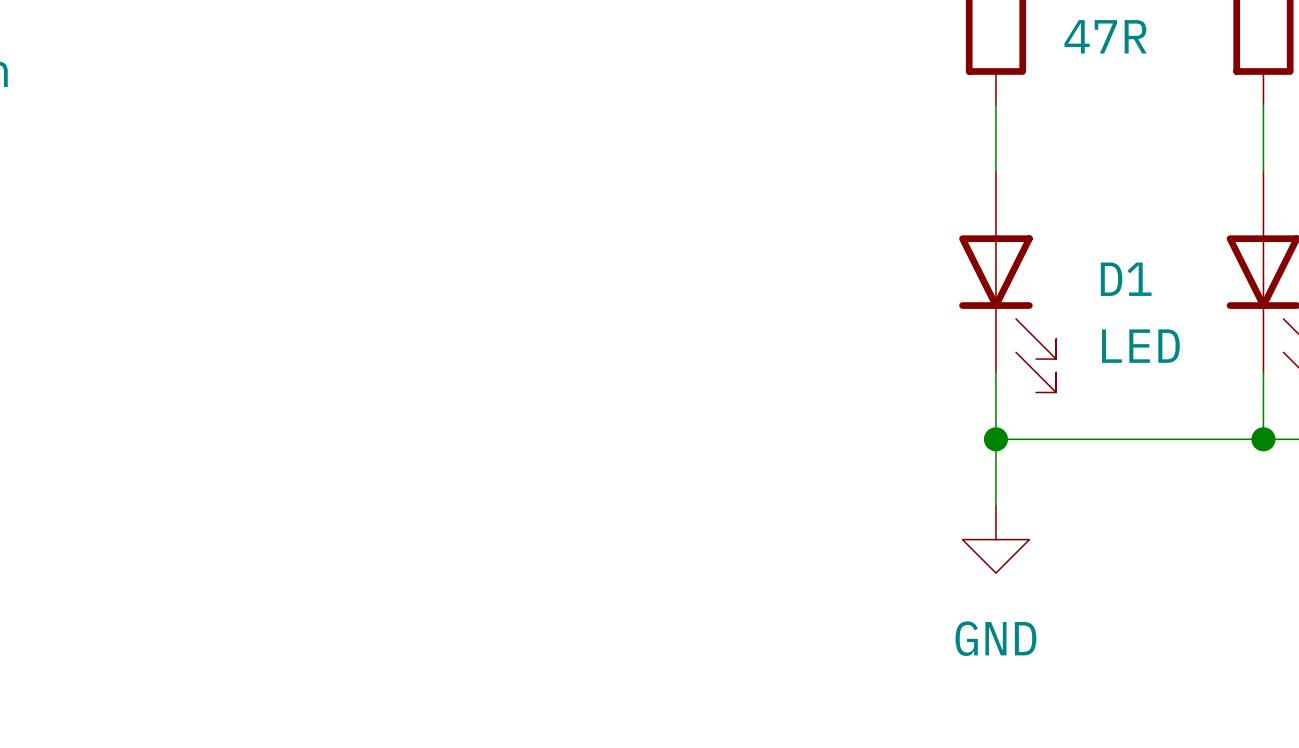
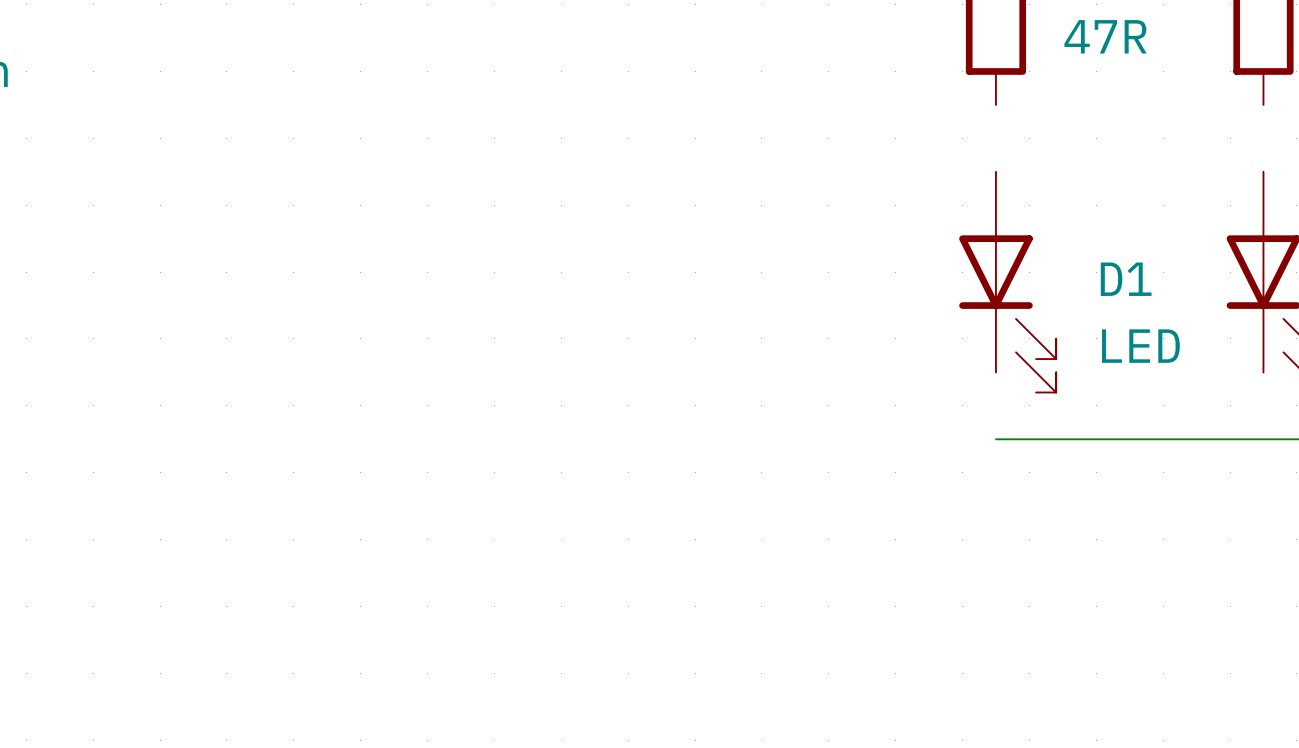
wire: (995, 104) (995, 171) -> none
wire: (1263, 104) (1263, 171) -> none
wire: (995, 372) (995, 506) -> none
wire: (1263, 372) (1263, 439) -> none
junction: (995, 439) -> none
junction: (1263, 439) -> none
power symbol: GND (995, 539) -> none

